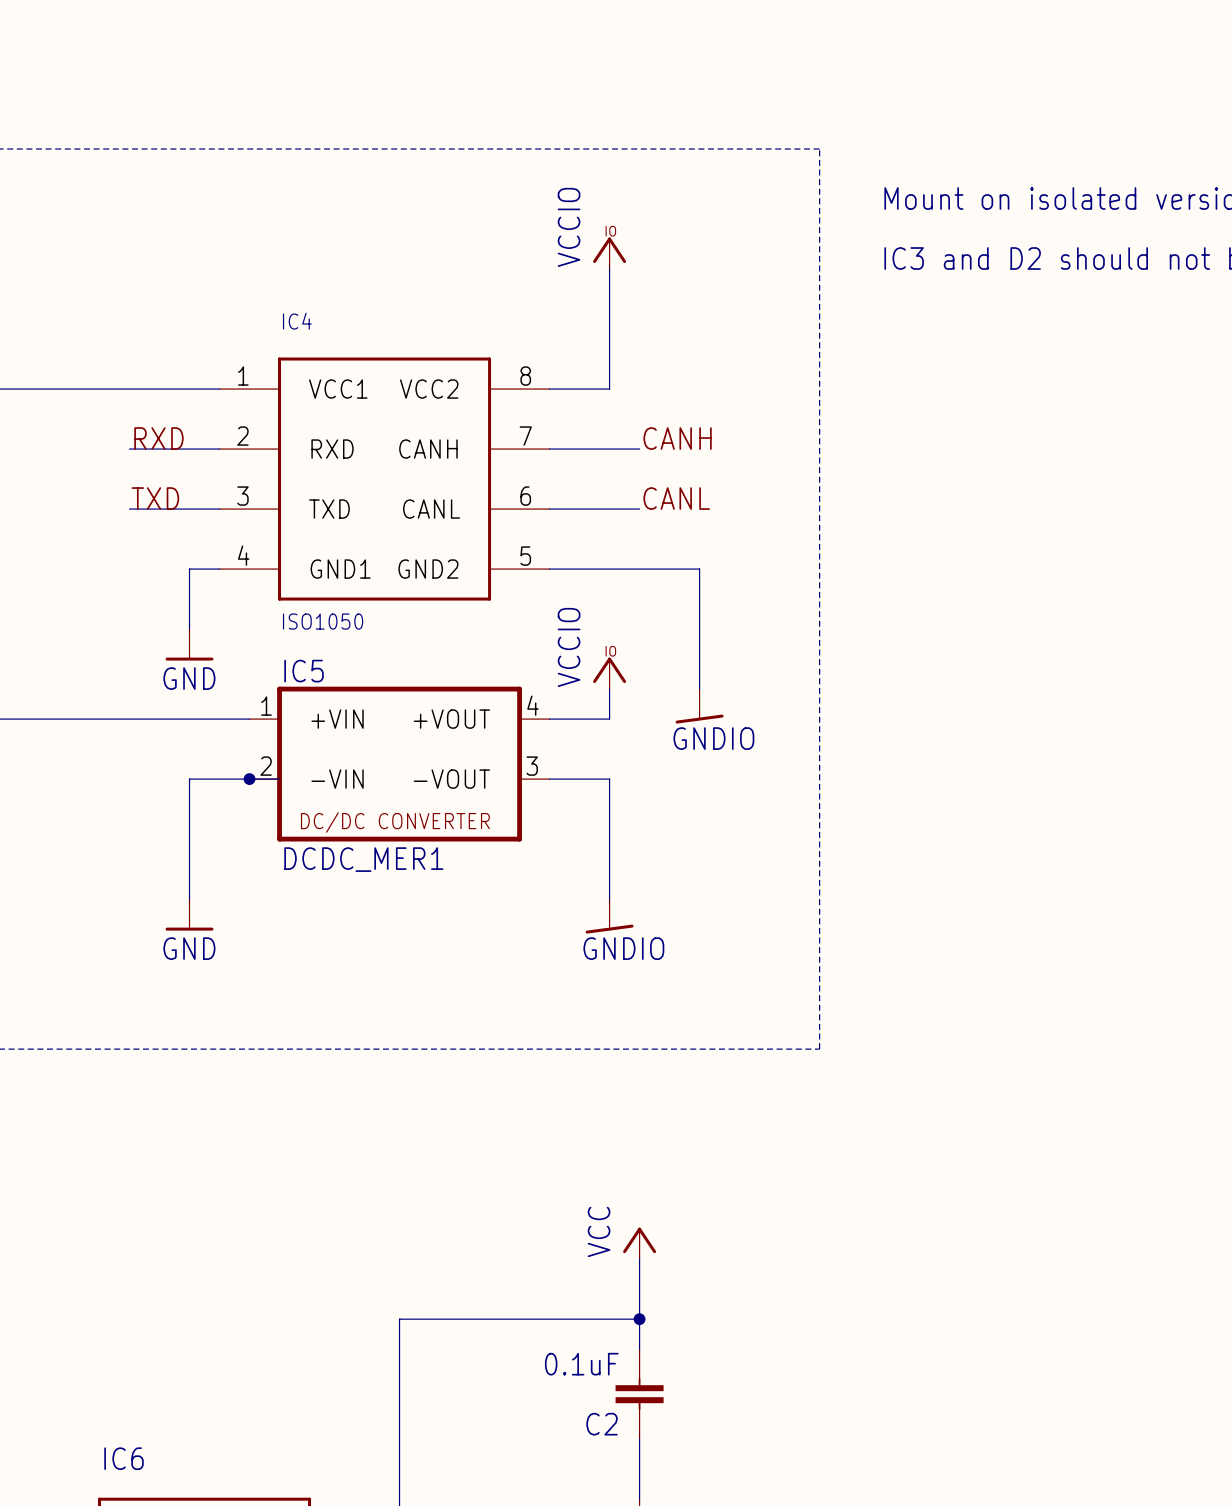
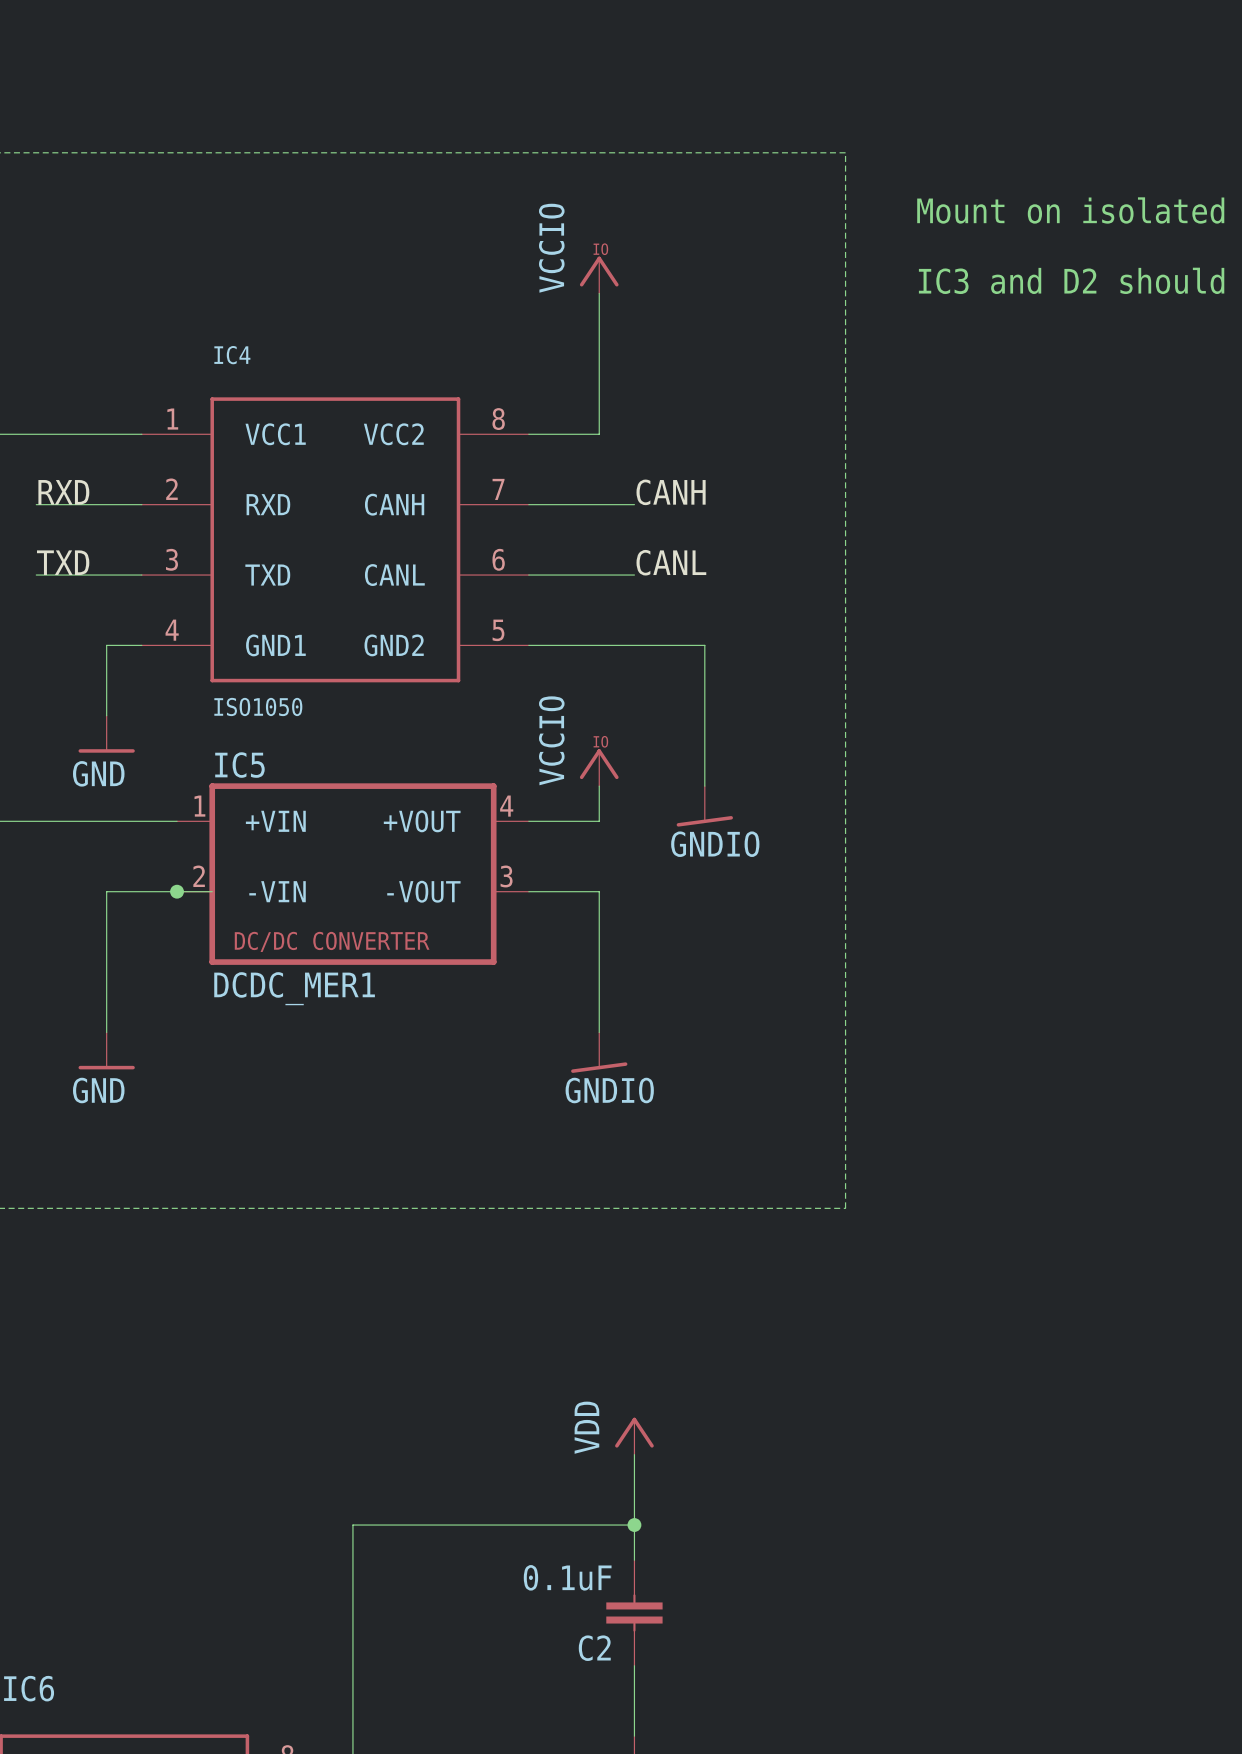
power symbol: VCC (639, 1243) -> VDD (634, 1436)

